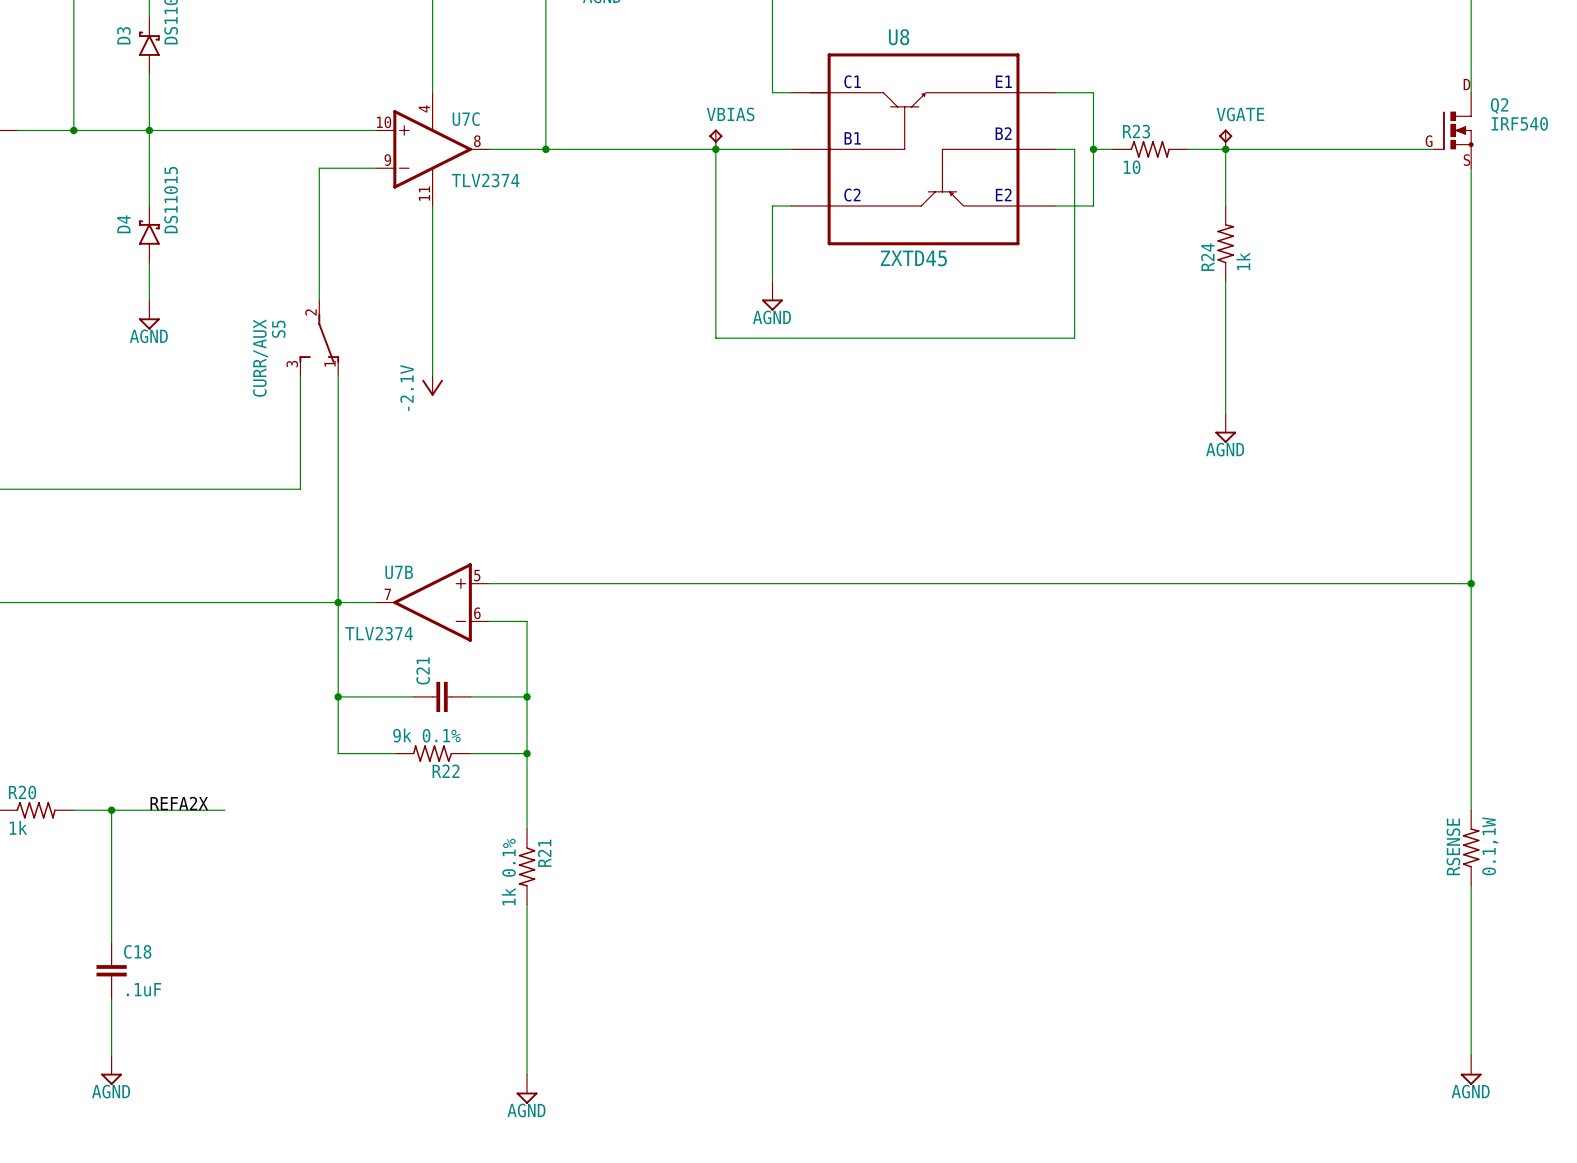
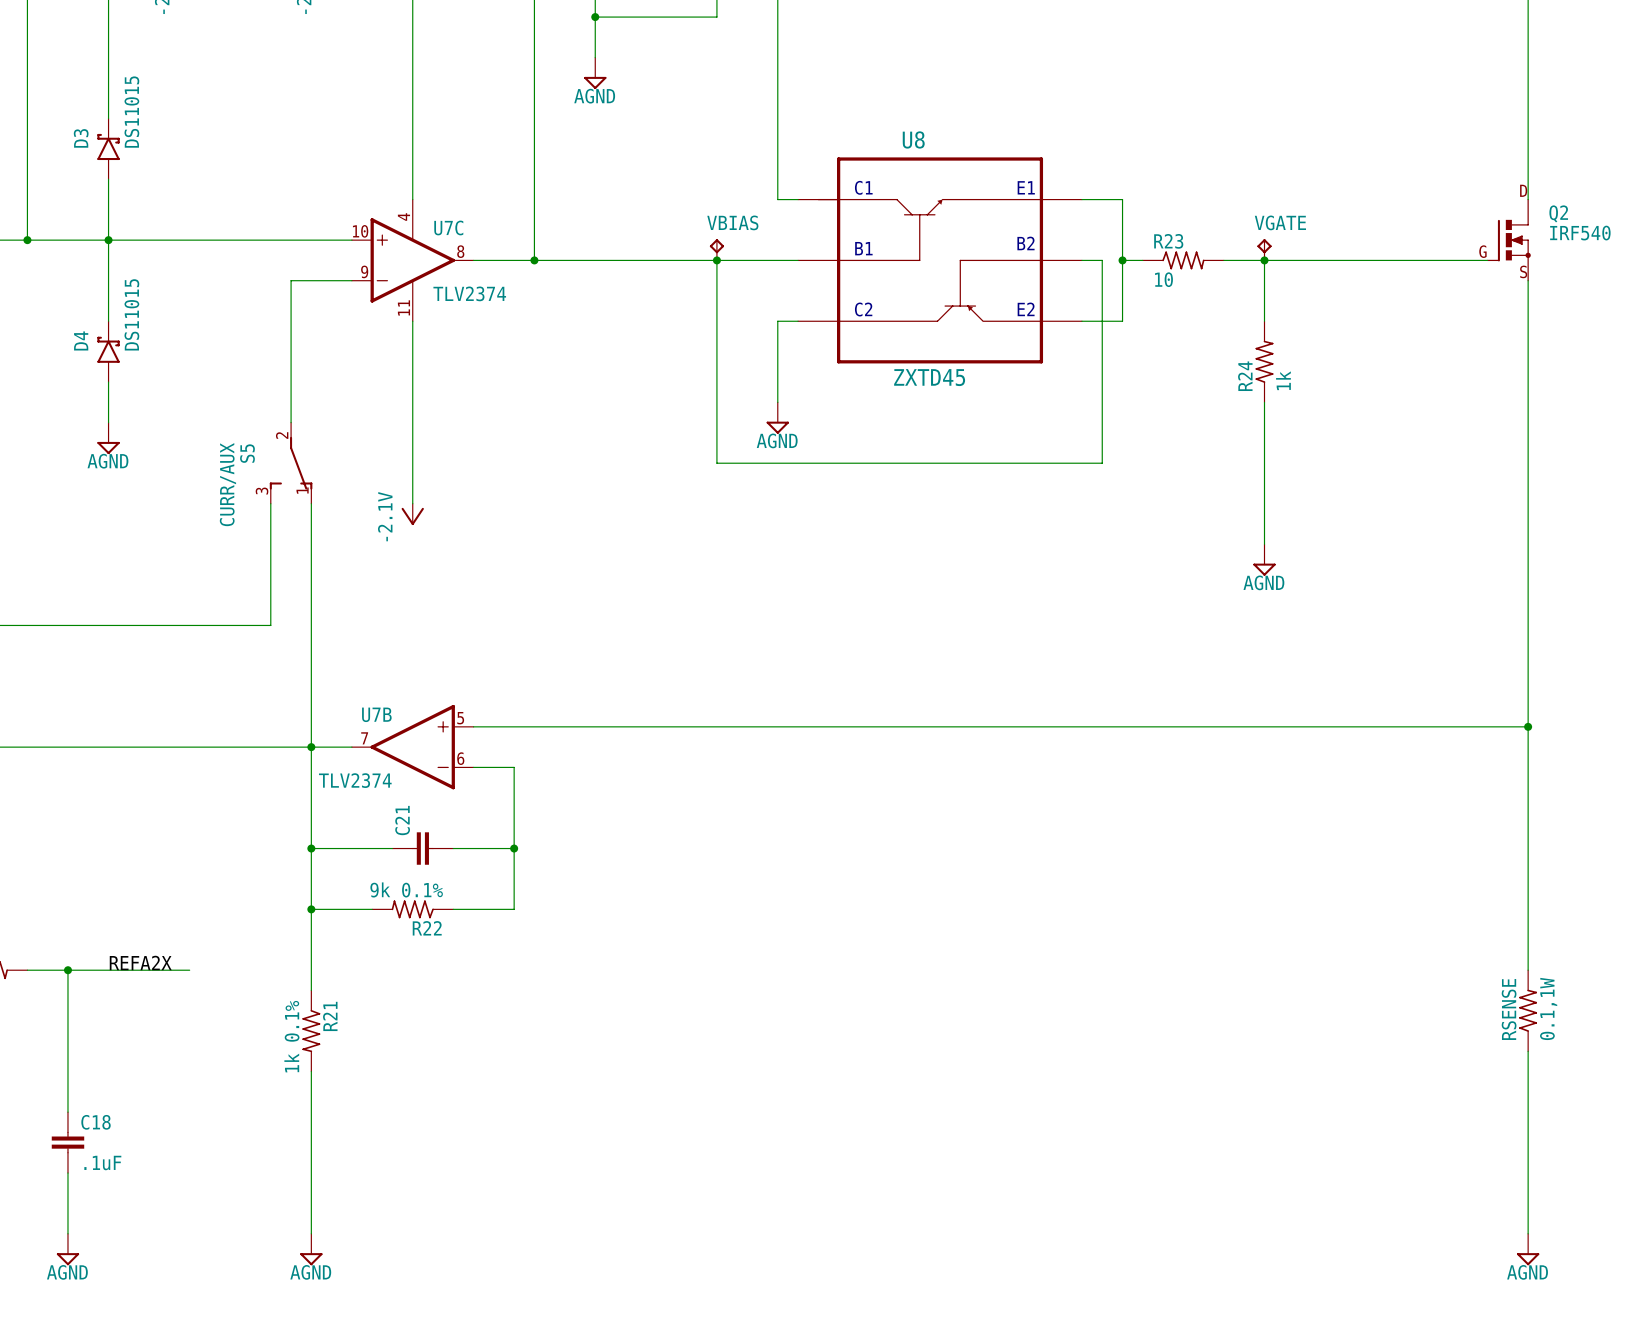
wire: none -> (311, 909) (311, 990)
junction: none -> (311, 909)
wire: (527, 753) (527, 829) -> none
junction: (527, 753) -> none
R21 position: (527, 866) -> (311, 1031)
wire: none -> (311, 1071) (311, 1233)
wire: (527, 904) (527, 1074) -> none
power symbol: none -> AGND (311, 1249)
power symbol: AGND (527, 1089) -> none

